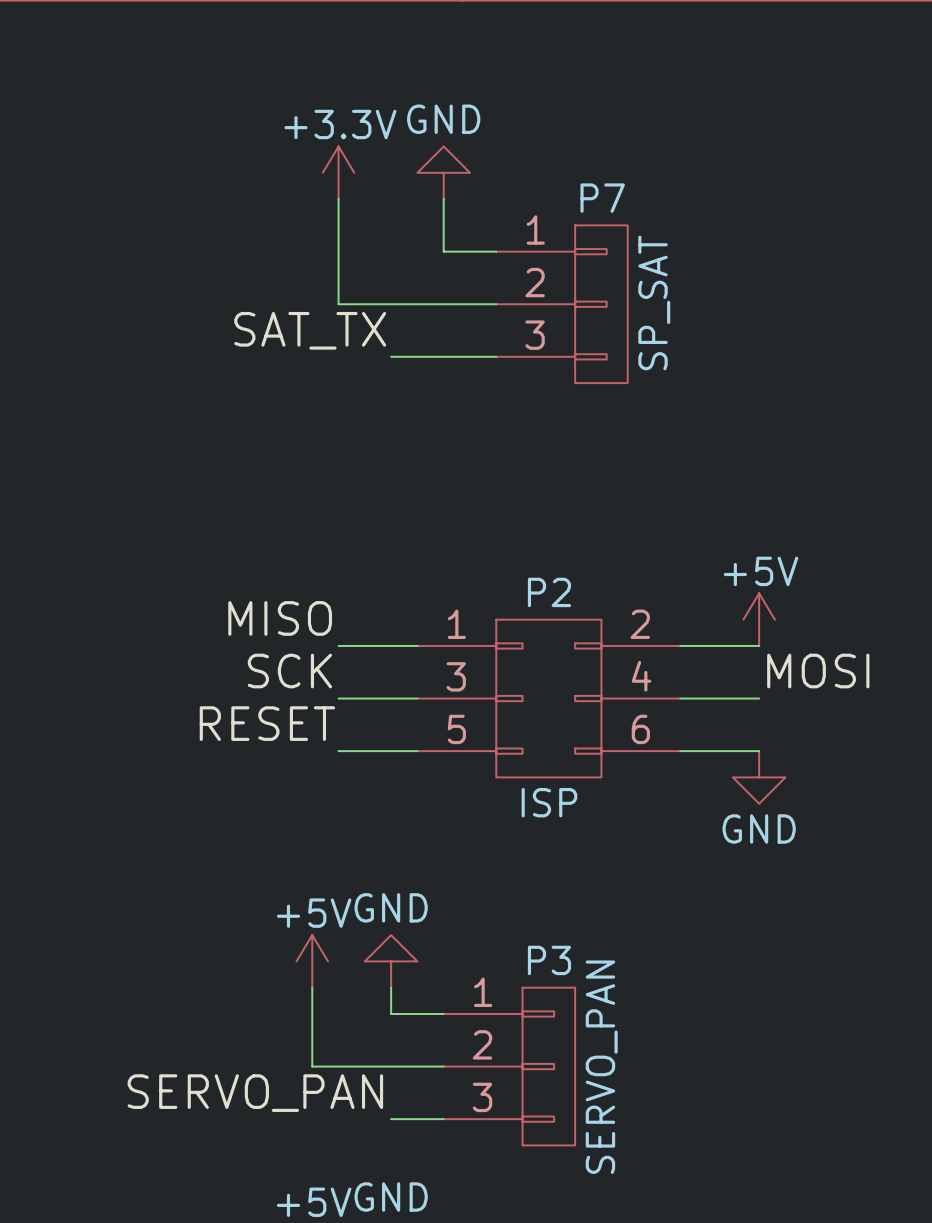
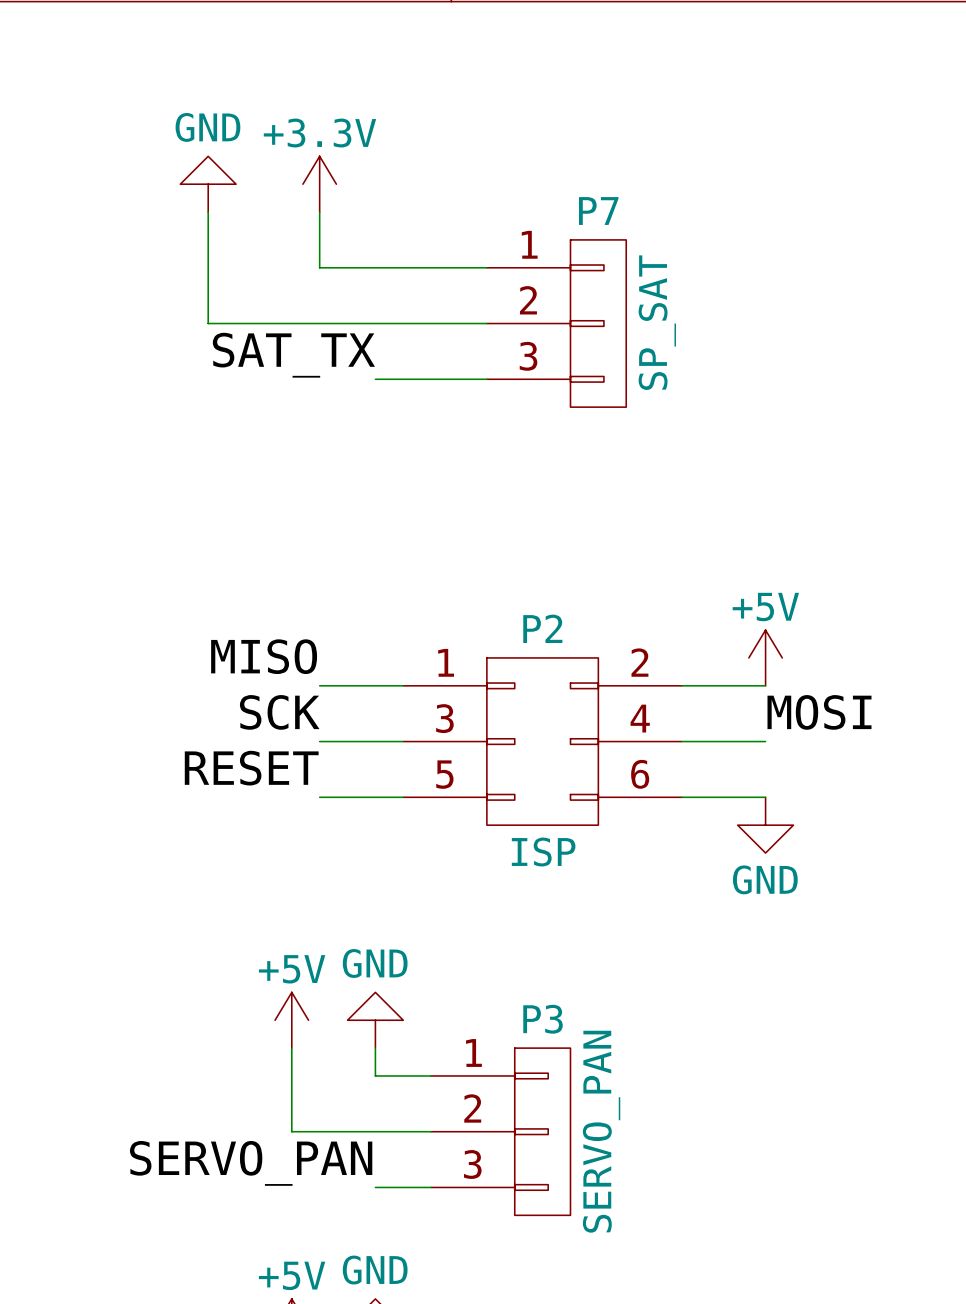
power symbol position: GND (443, 172) -> GND (208, 184)
wire: (443, 199) (443, 251) -> (319, 267) (431, 267)
wire: (338, 251) (338, 304) -> (208, 212) (208, 323) (319, 323)

